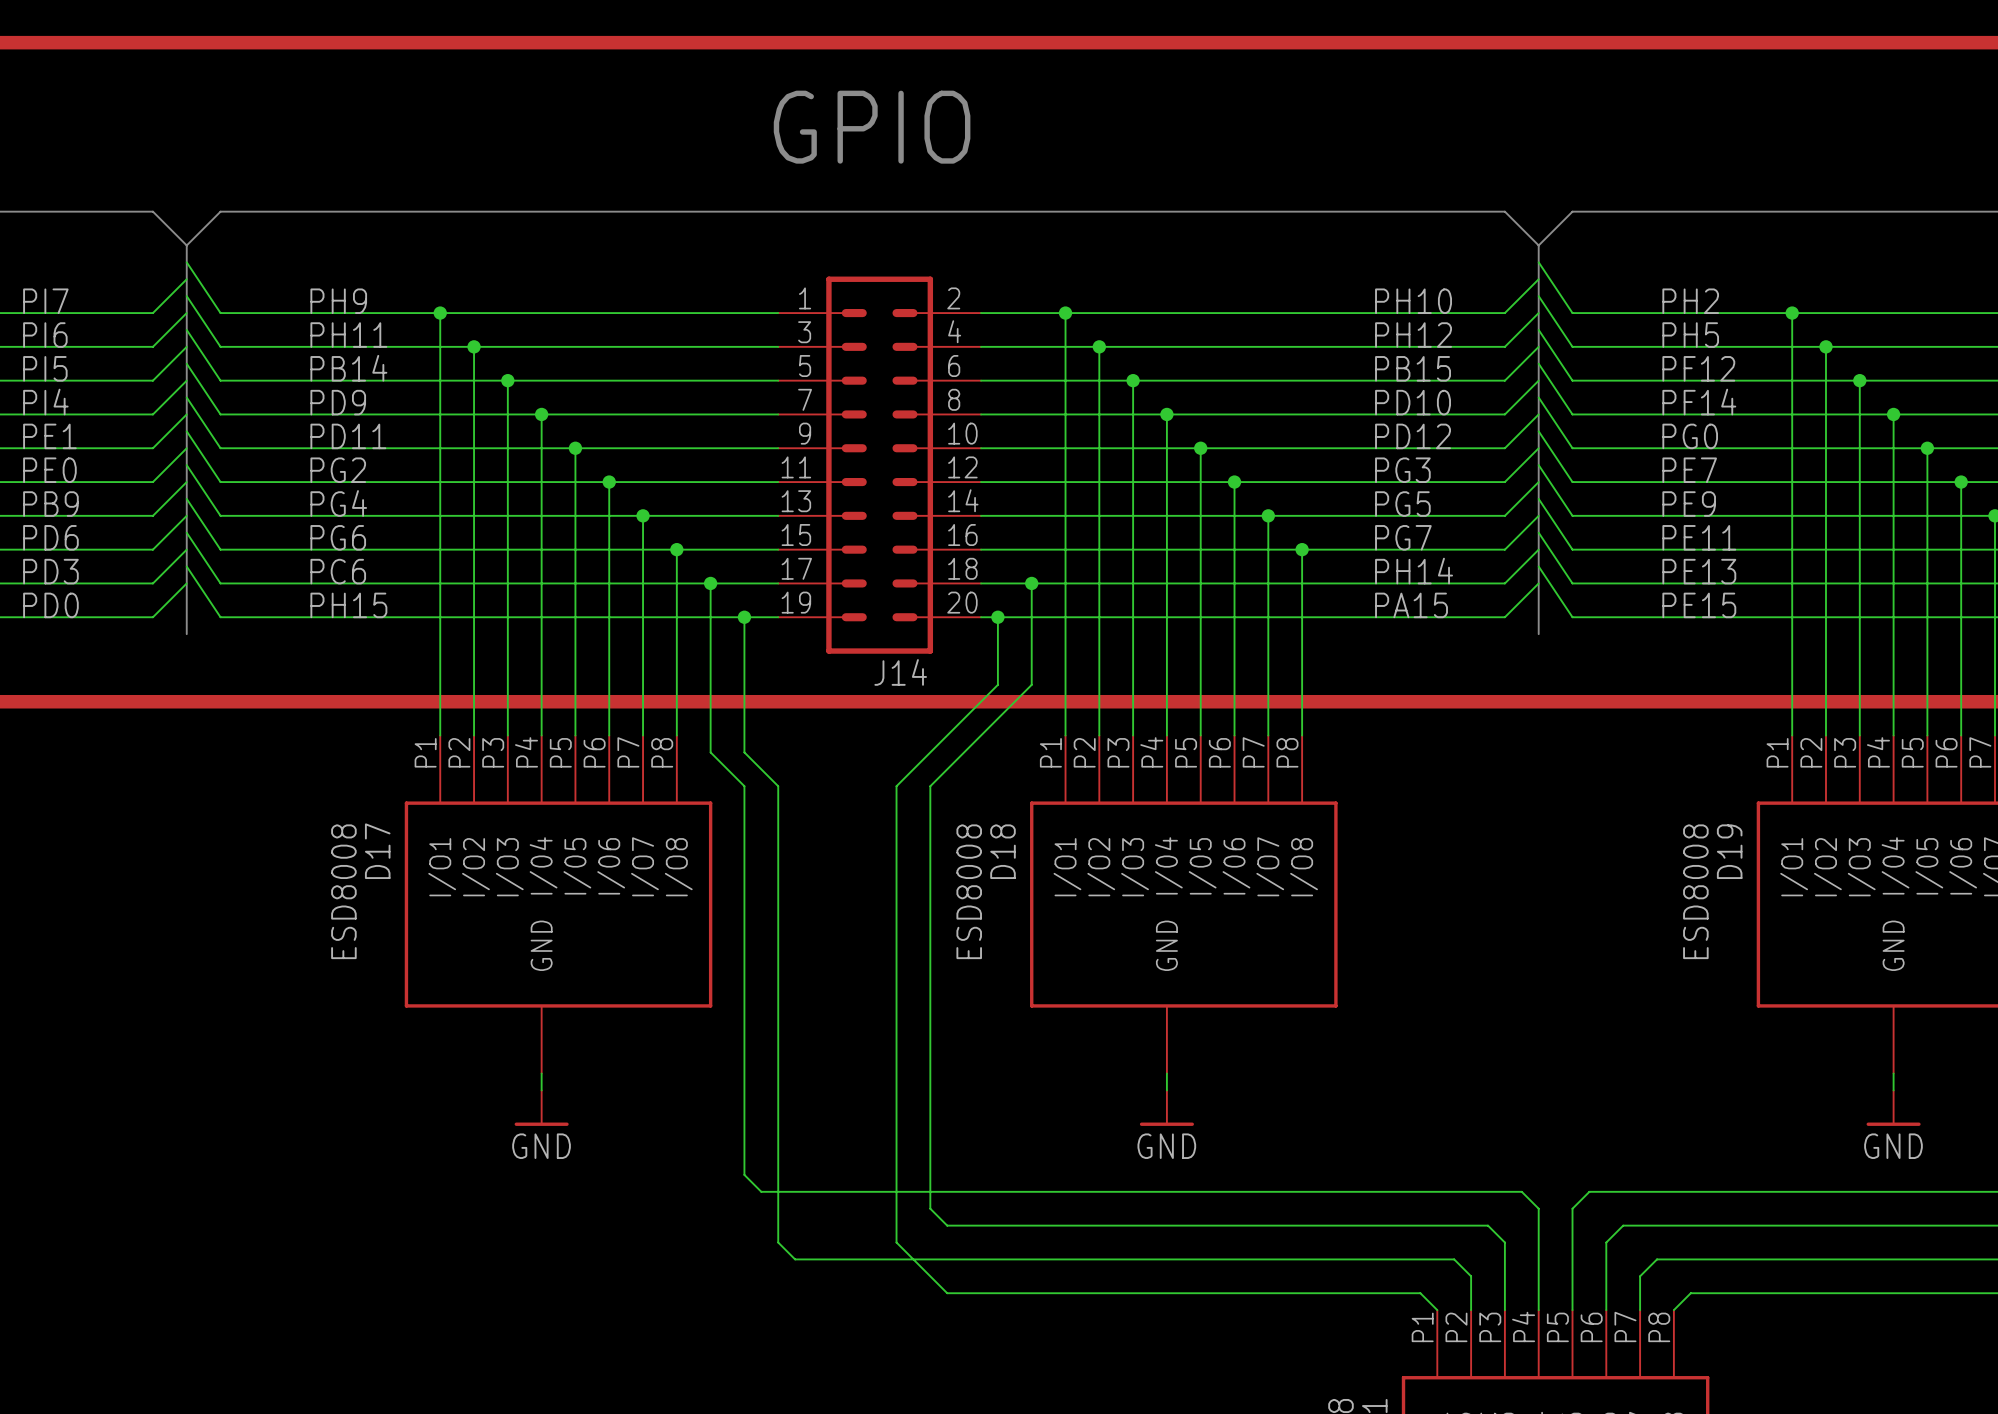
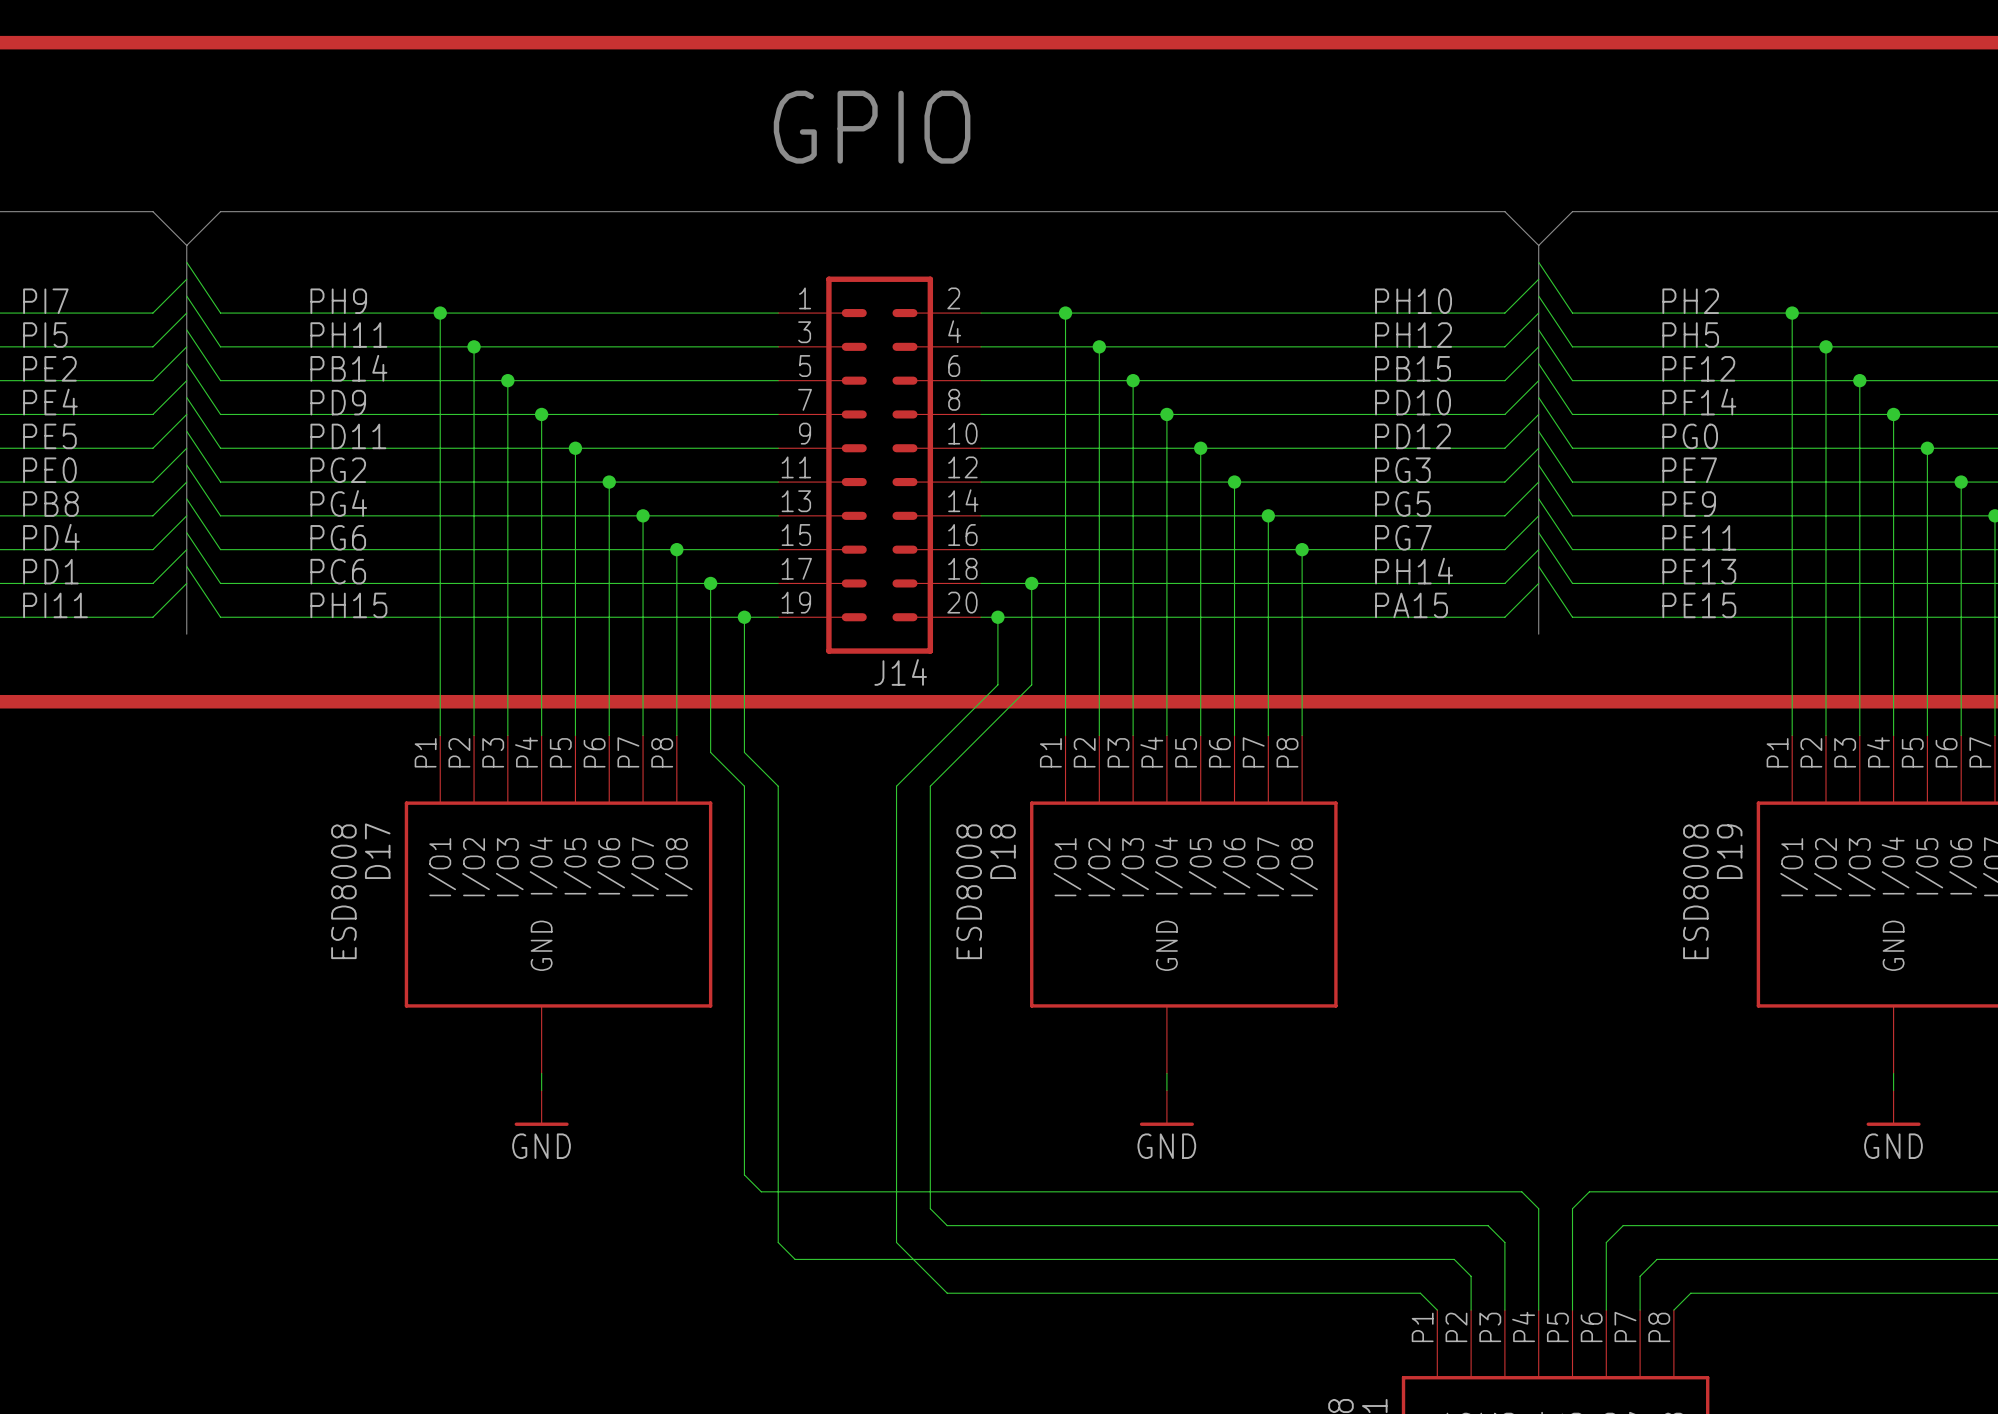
label: PI6 (45, 335) -> PI5 (45, 335)
label: PI5 (45, 368) -> PE2 (49, 368)
label: PI4 (45, 402) -> PE4 (50, 402)
label: PE1 (49, 436) -> PE5 (49, 436)
label: PB9 (50, 504) -> PB8 (50, 504)
label: PD6 (50, 537) -> PD4 (51, 537)
label: PD3 (50, 571) -> PD1 (50, 571)
label: PD0 (50, 605) -> PI11 (55, 605)

